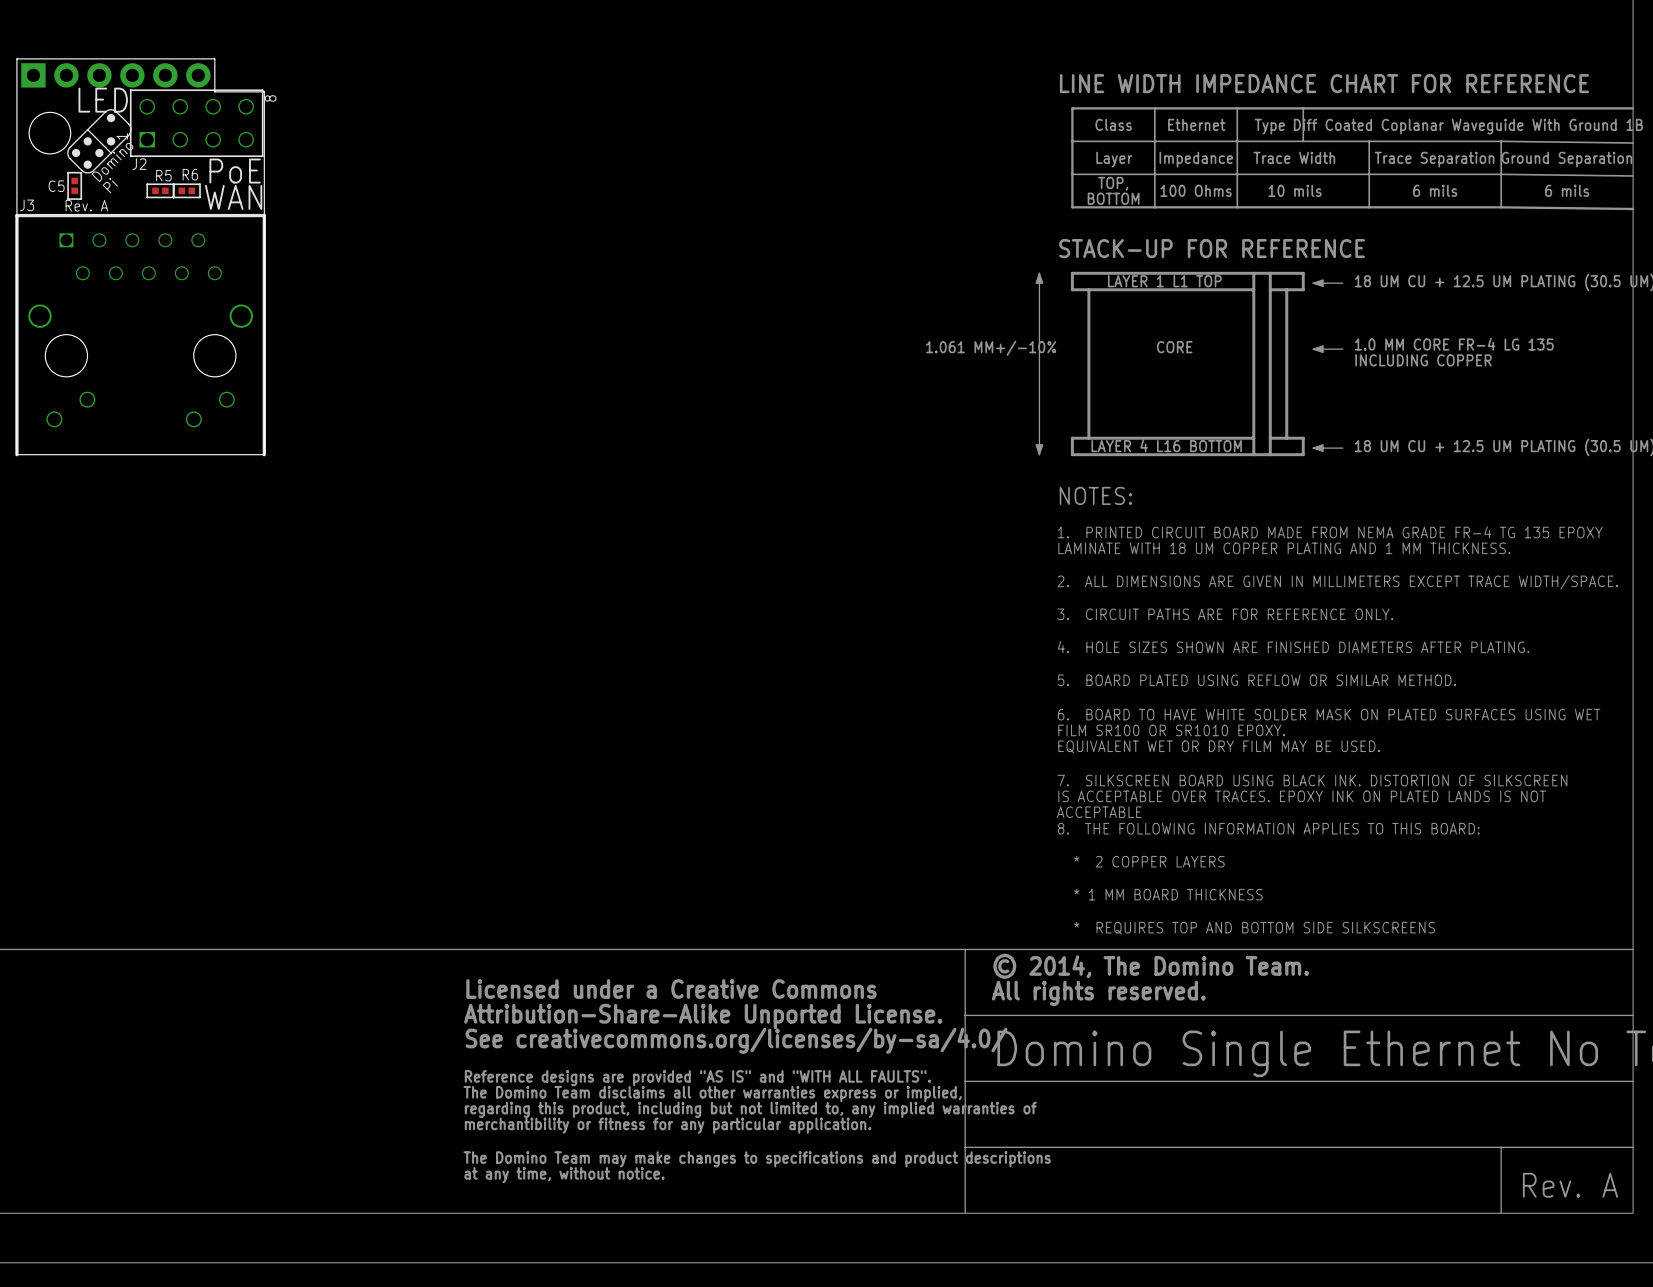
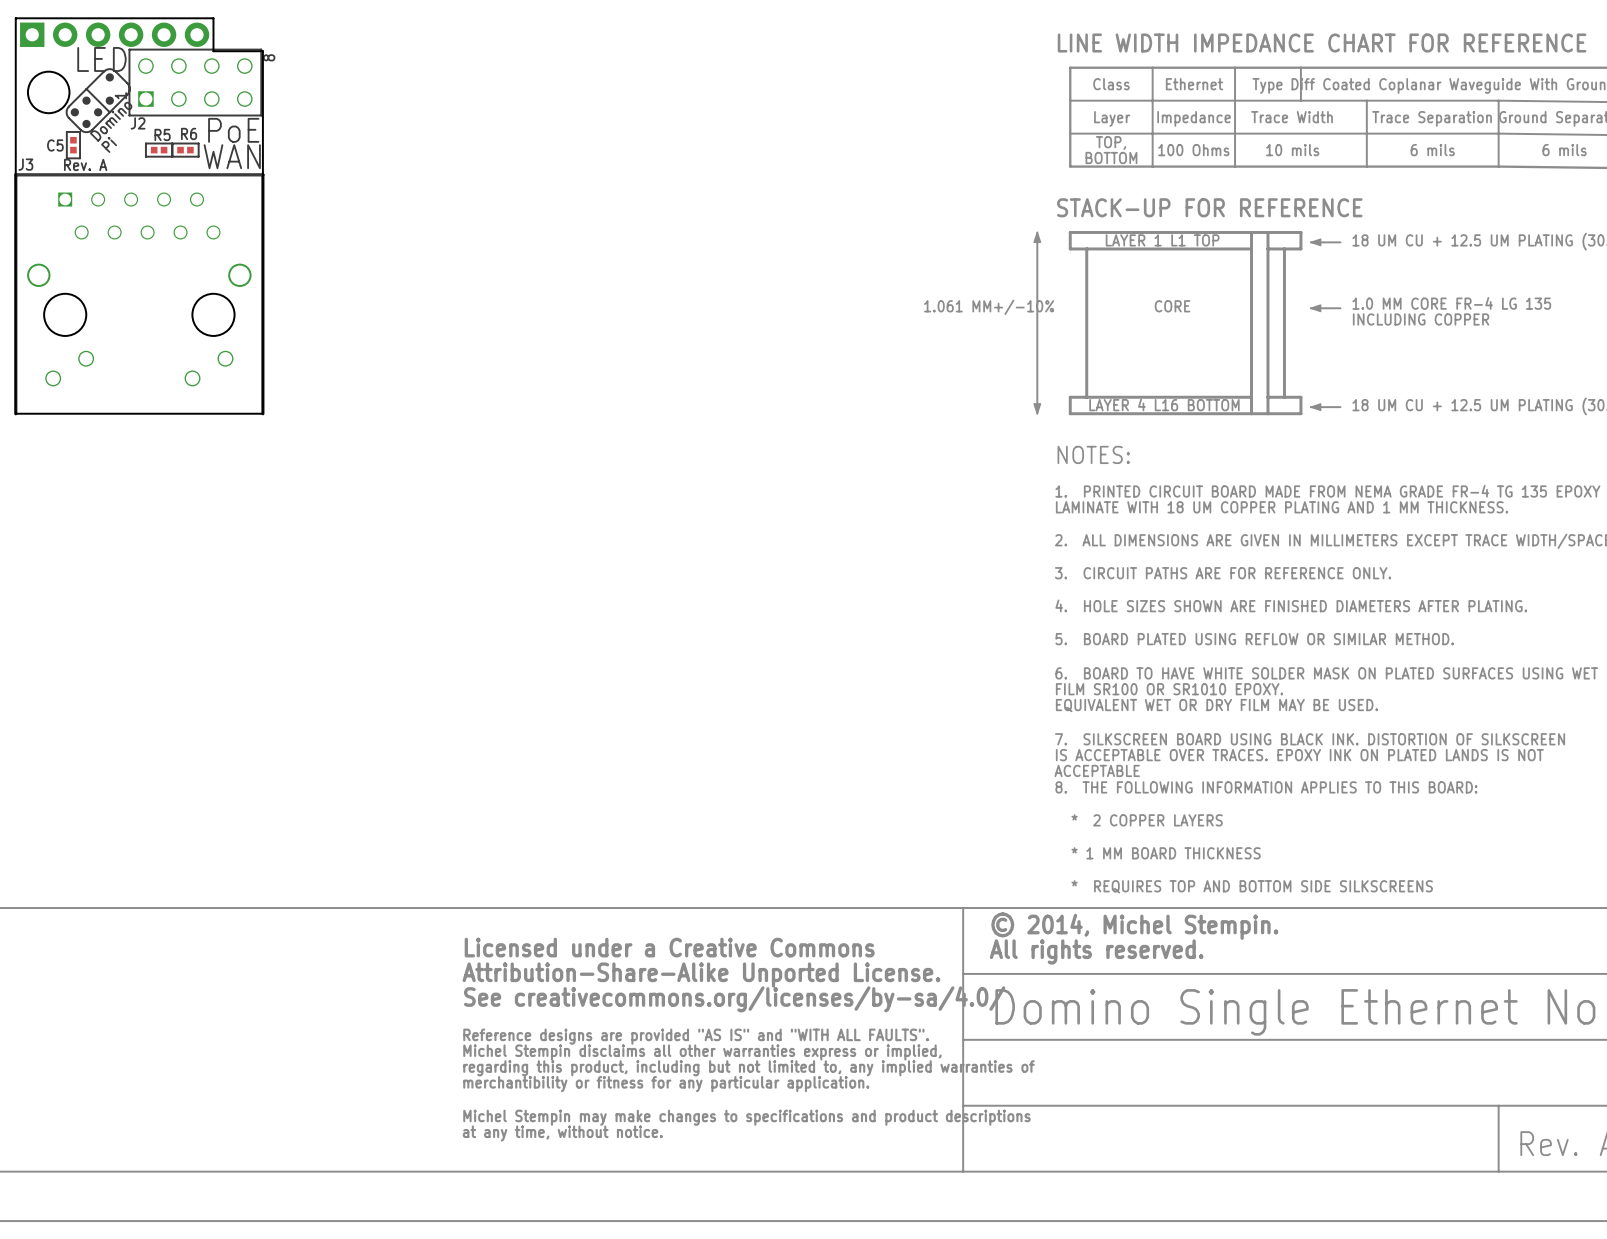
text: © 2014, The Domino Team. (1151, 966) -> © 2014, Michel Stempin. (1134, 926)
text: The Domino Team disclaims all other warranties express or implied, (712, 1094) -> Michel Stempin disclaims all other warranties express or implied, (702, 1052)
text: The Domino Team may make changes to specifications and product descriptions (757, 1159) -> Michel Stempin may make changes to specifications and product descriptions (746, 1117)

